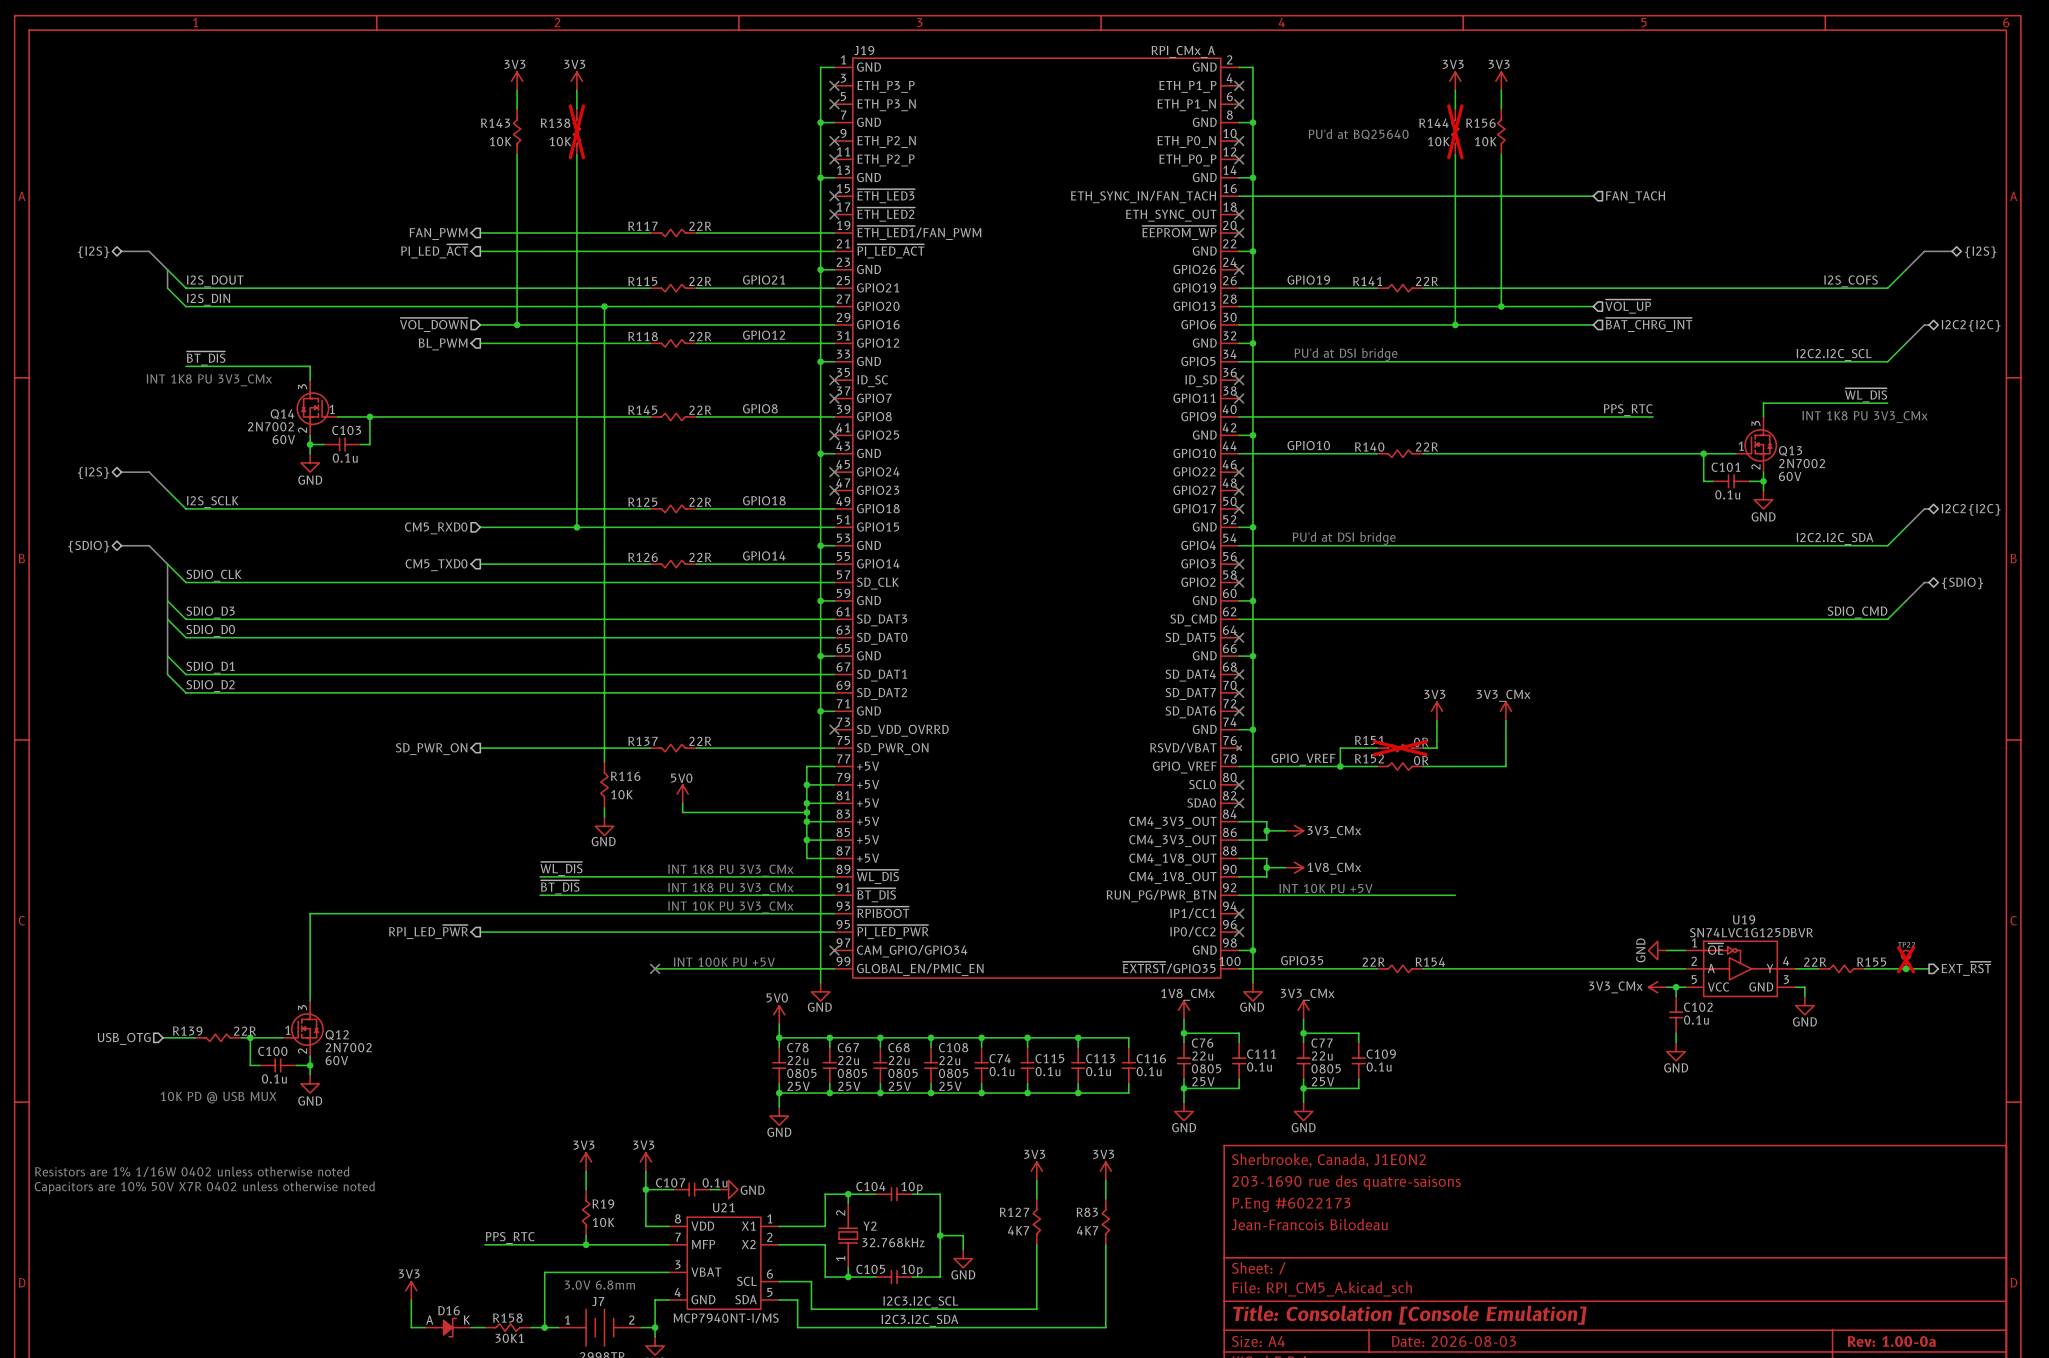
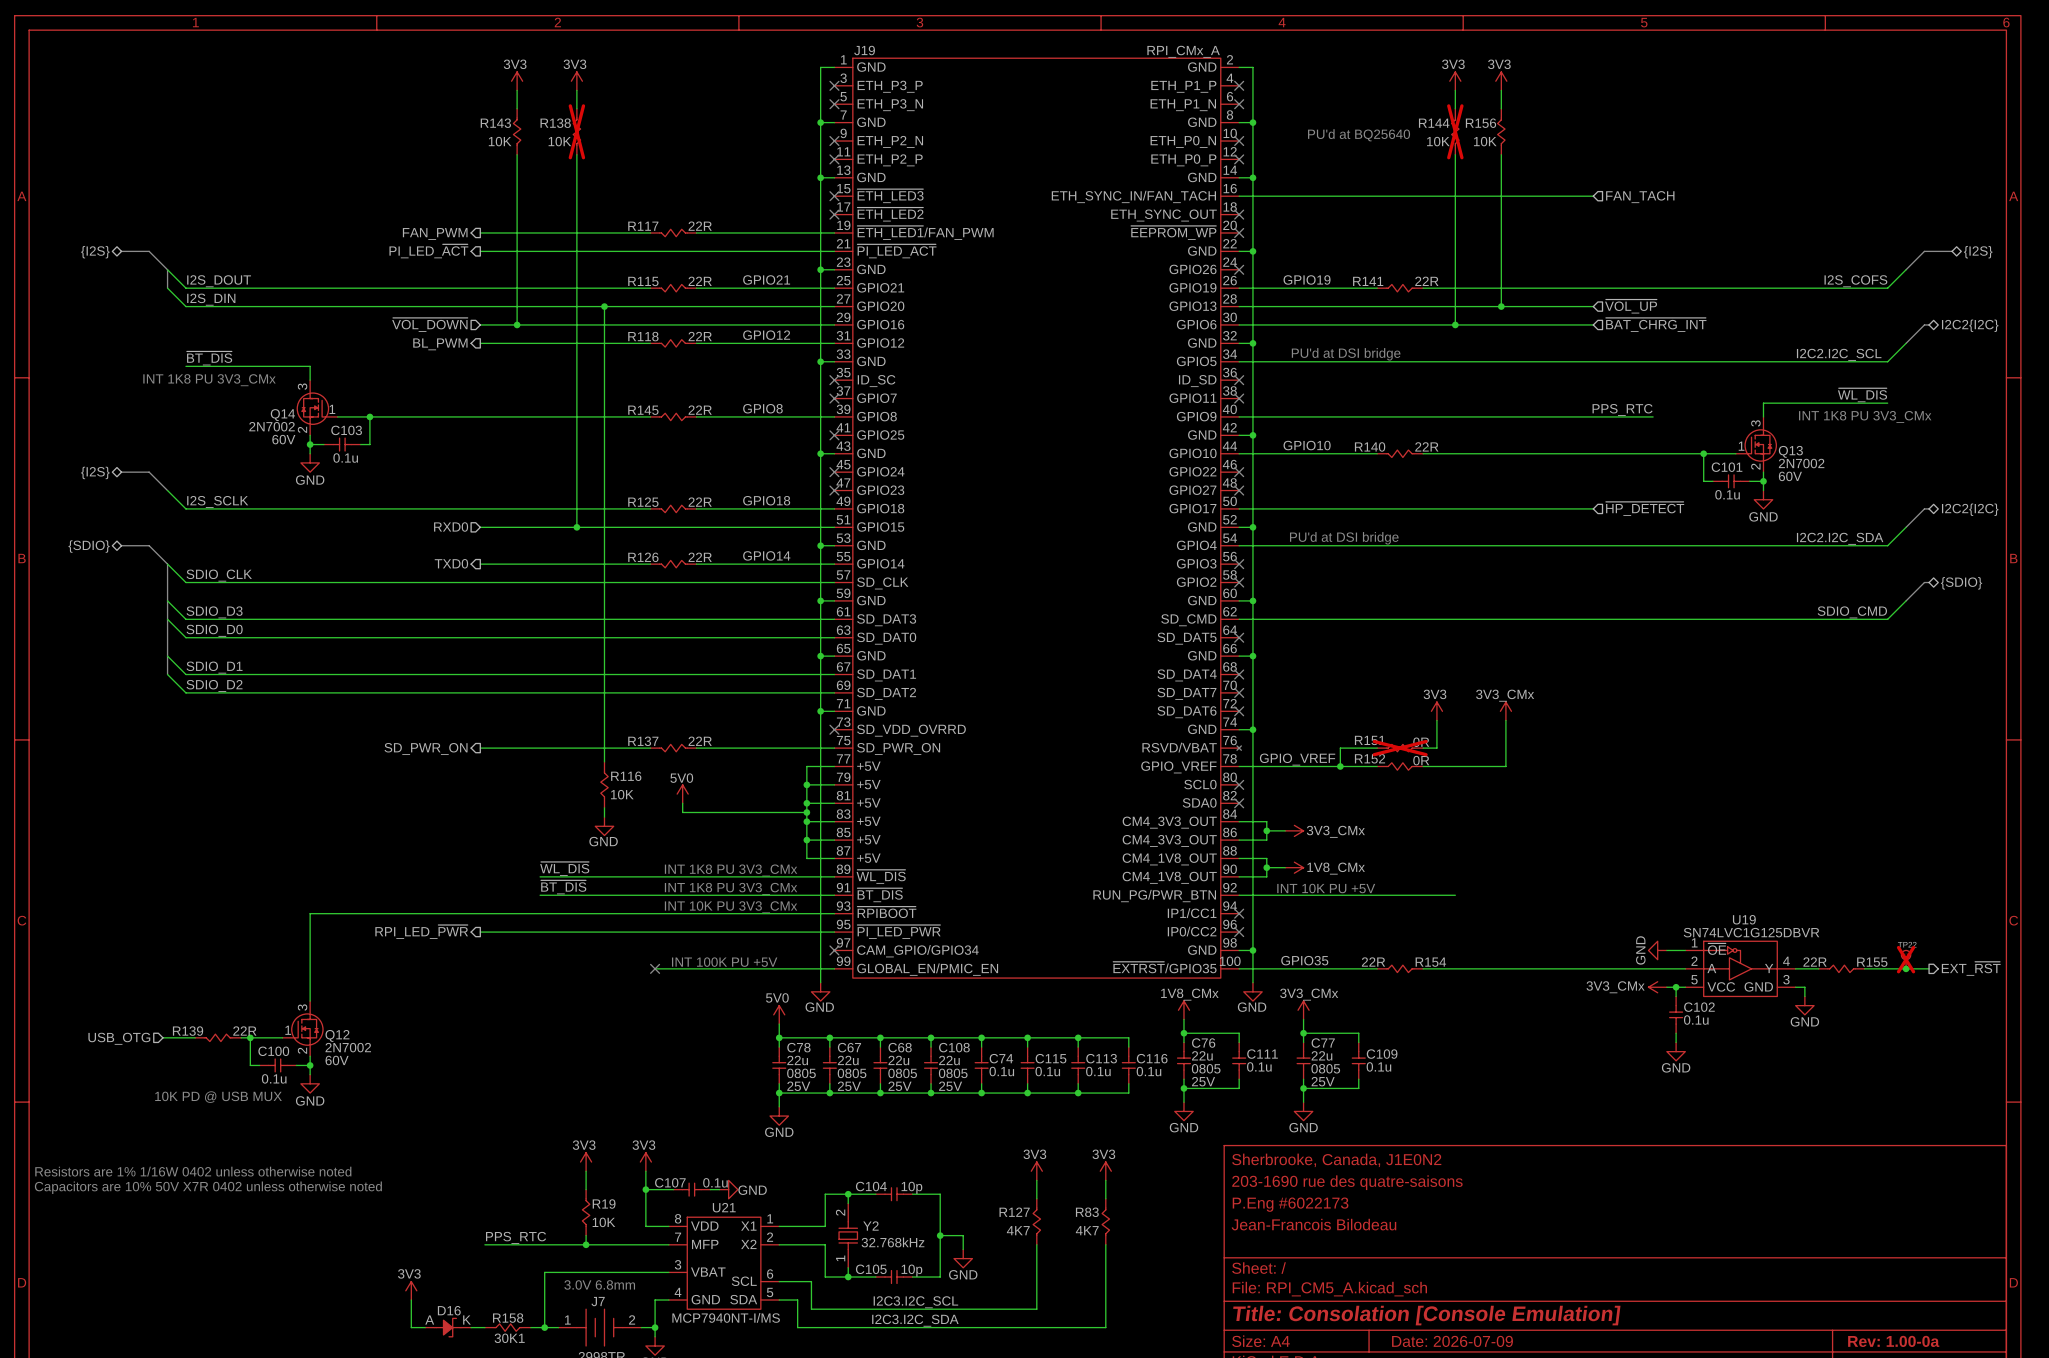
wire: none -> (1239, 508) (1593, 508)
no-connect mark: (1239, 508) -> none
hierarchical label: none -> ~{HP_DETECT} (1645, 508)
hierarchical label: CM5_RXD0 (436, 528) -> RXD0 (451, 526)
hierarchical label: CM5_TXD0 (436, 565) -> TXD0 (451, 563)
title block: Date: 2026-08-03 (1453, 1341) -> Date: 2026-07-09 (1452, 1341)

